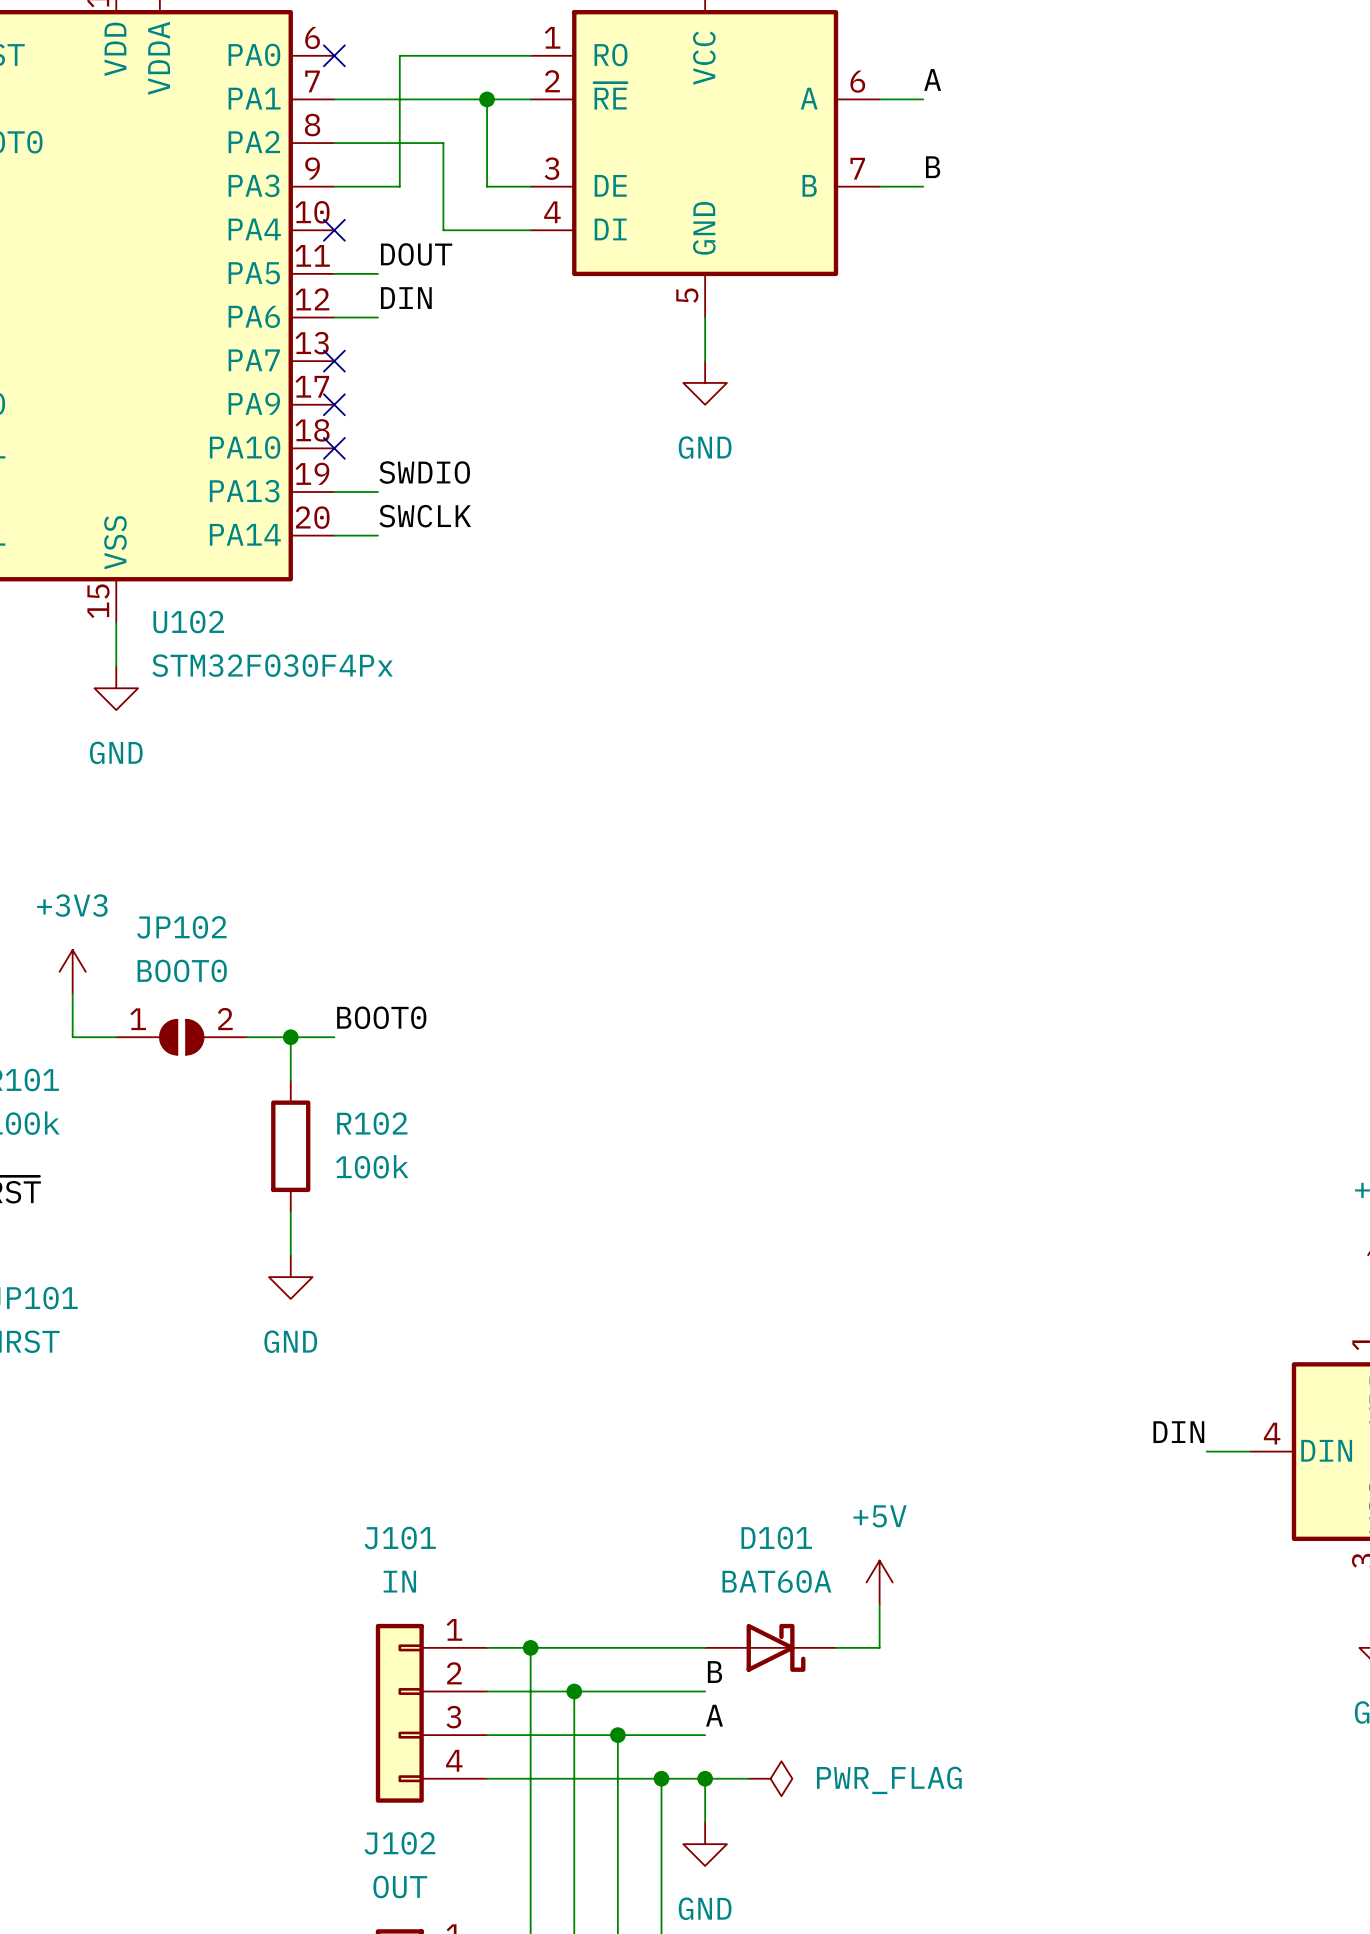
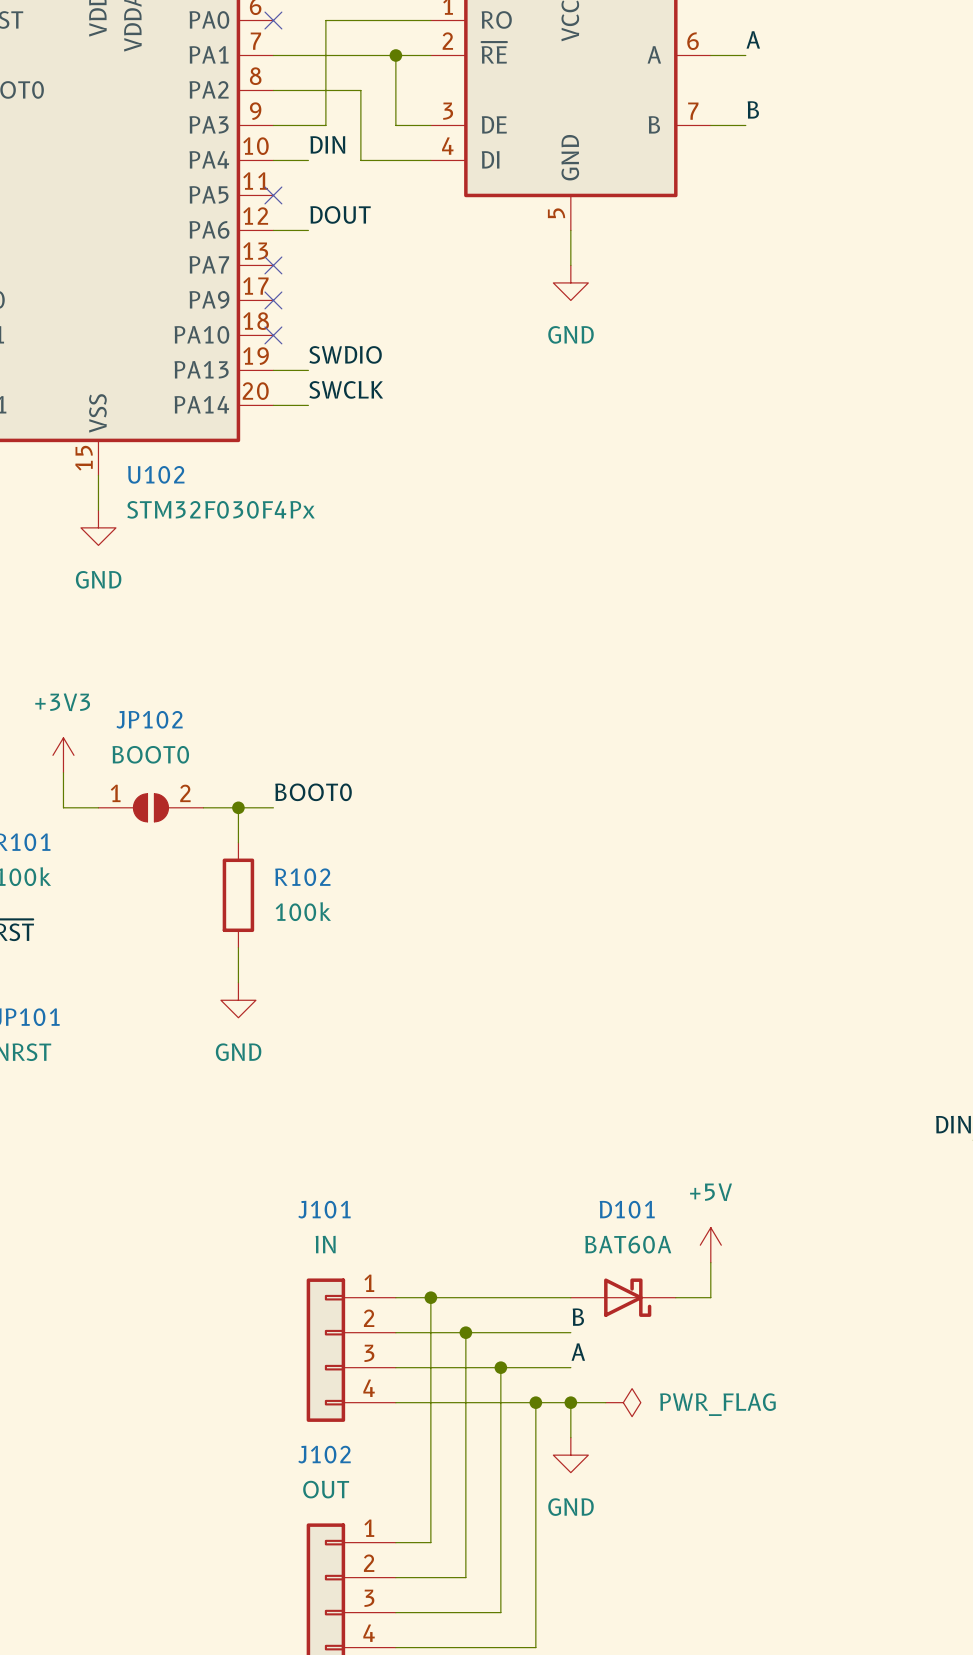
label: none -> DIN (327, 144)
no-connect mark position: (334, 230) -> (273, 195)
label: DOUT (416, 254) -> none
wire: (334, 273) (377, 273) -> (273, 160) (308, 160)
label: DIN (406, 298) -> DOUT (340, 214)

